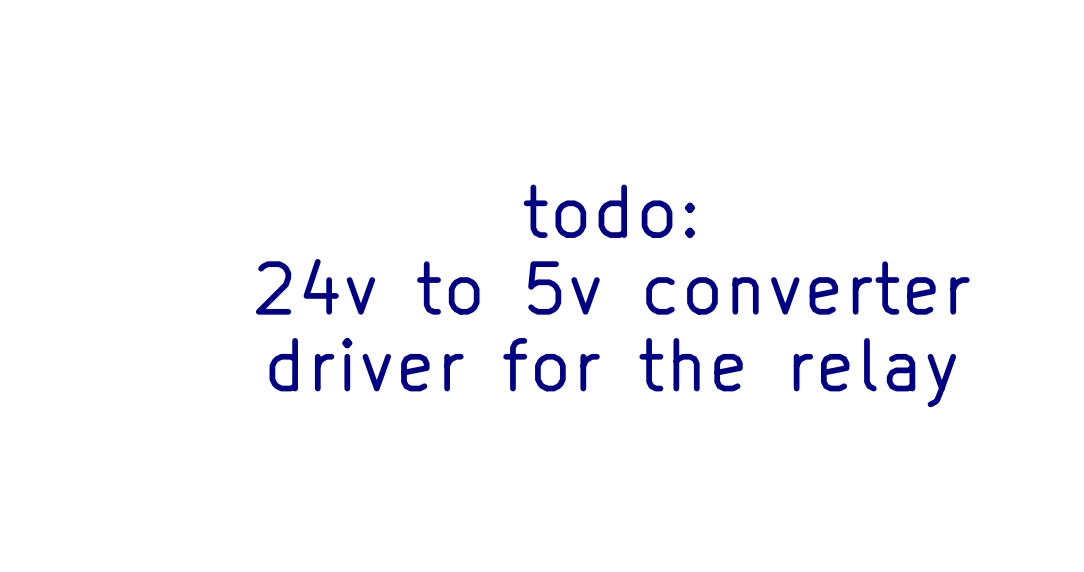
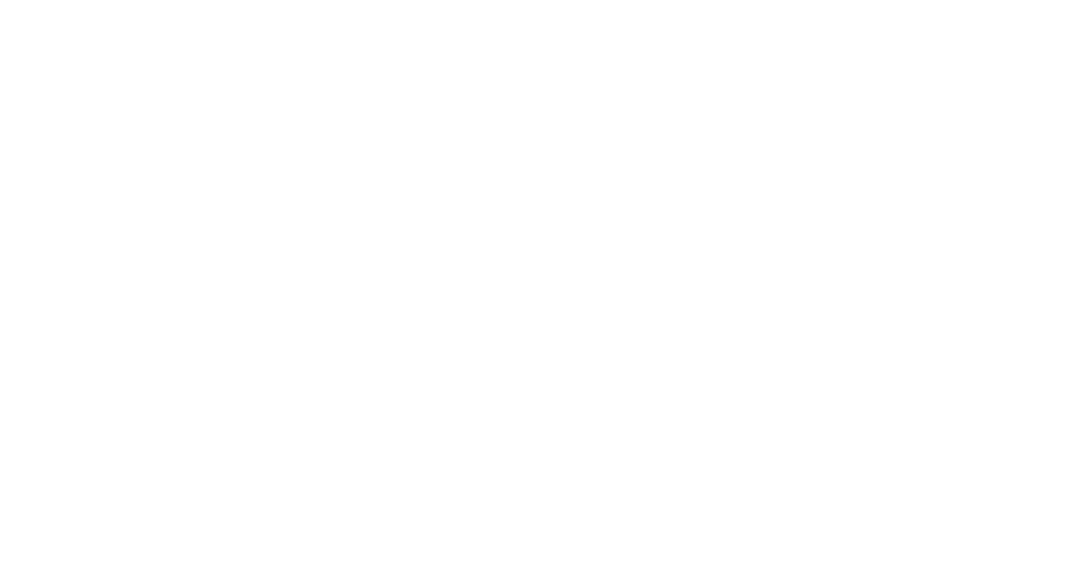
text: todo: (609, 211) -> none
text: 24v to 5v converter (612, 286) -> none
text: driver for the relay (612, 372) -> none

